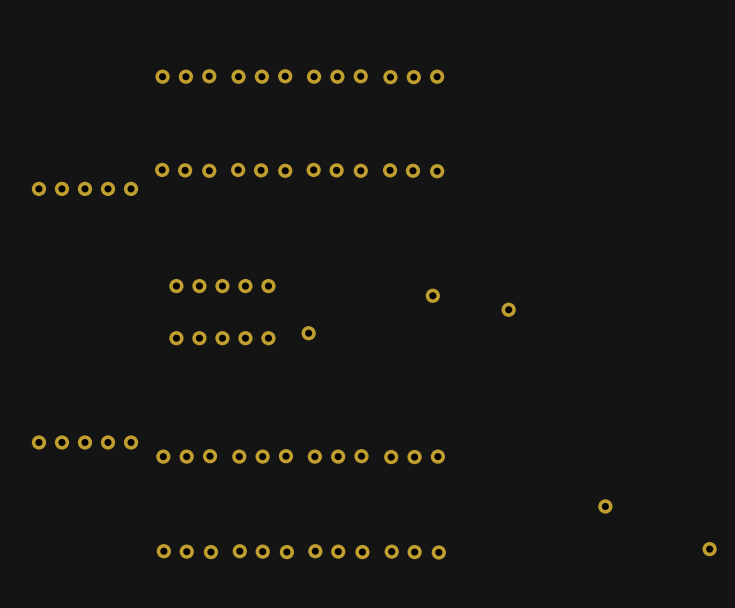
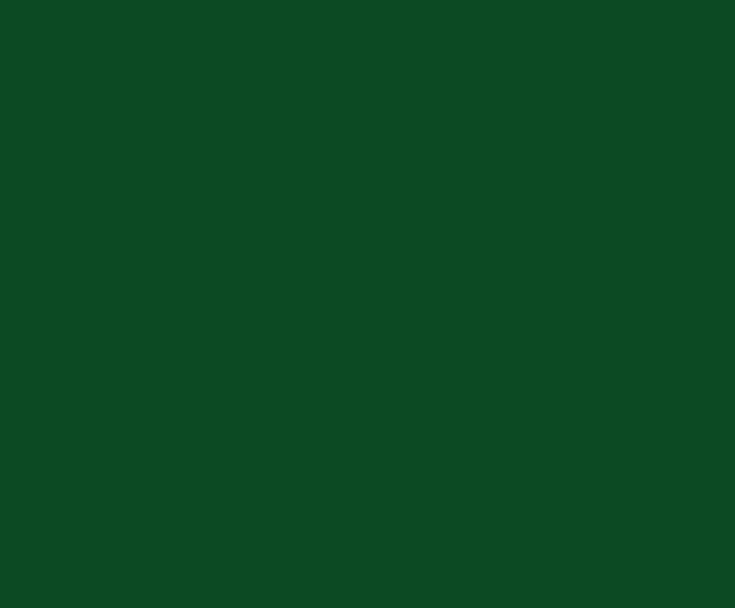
via: (162, 76) -> none
via: (185, 76) -> none
via: (209, 76) -> none
via: (238, 76) -> none
via: (261, 76) -> none
via: (285, 76) -> none
via: (314, 76) -> none
via: (337, 76) -> none
via: (360, 76) -> none
via: (437, 76) -> none
via: (390, 77) -> none
via: (413, 77) -> none
via: (162, 169) -> none
via: (238, 169) -> none
via: (313, 169) -> none
via: (185, 170) -> none
via: (209, 170) -> none
via: (261, 170) -> none
via: (285, 170) -> none
via: (336, 170) -> none
via: (360, 170) -> none
via: (390, 170) -> none
via: (412, 170) -> none
via: (437, 171) -> none
via: (38, 188) -> none
via: (61, 188) -> none
via: (84, 188) -> none
via: (108, 188) -> none
via: (131, 188) -> none
via: (176, 286) -> none
via: (199, 286) -> none
via: (222, 286) -> none
via: (245, 286) -> none
via: (268, 286) -> none
via: (432, 295) -> none
via: (508, 309) -> none
via: (308, 333) -> none
via: (176, 338) -> none
via: (199, 338) -> none
via: (222, 338) -> none
via: (245, 338) -> none
via: (268, 338) -> none
via: (38, 442) -> none
via: (61, 442) -> none
via: (84, 442) -> none
via: (108, 442) -> none
via: (131, 442) -> none
via: (163, 456) -> none
via: (186, 456) -> none
via: (210, 456) -> none
via: (239, 456) -> none
via: (262, 456) -> none
via: (285, 456) -> none
via: (314, 456) -> none
via: (338, 456) -> none
via: (361, 456) -> none
via: (437, 456) -> none
via: (391, 457) -> none
via: (414, 457) -> none
via: (605, 506) -> none
via: (709, 549) -> none
via: (163, 551) -> none
via: (186, 551) -> none
via: (239, 551) -> none
via: (262, 551) -> none
via: (315, 551) -> none
via: (338, 551) -> none
via: (391, 551) -> none
via: (210, 552) -> none
via: (286, 552) -> none
via: (362, 552) -> none
via: (414, 552) -> none
via: (438, 552) -> none

